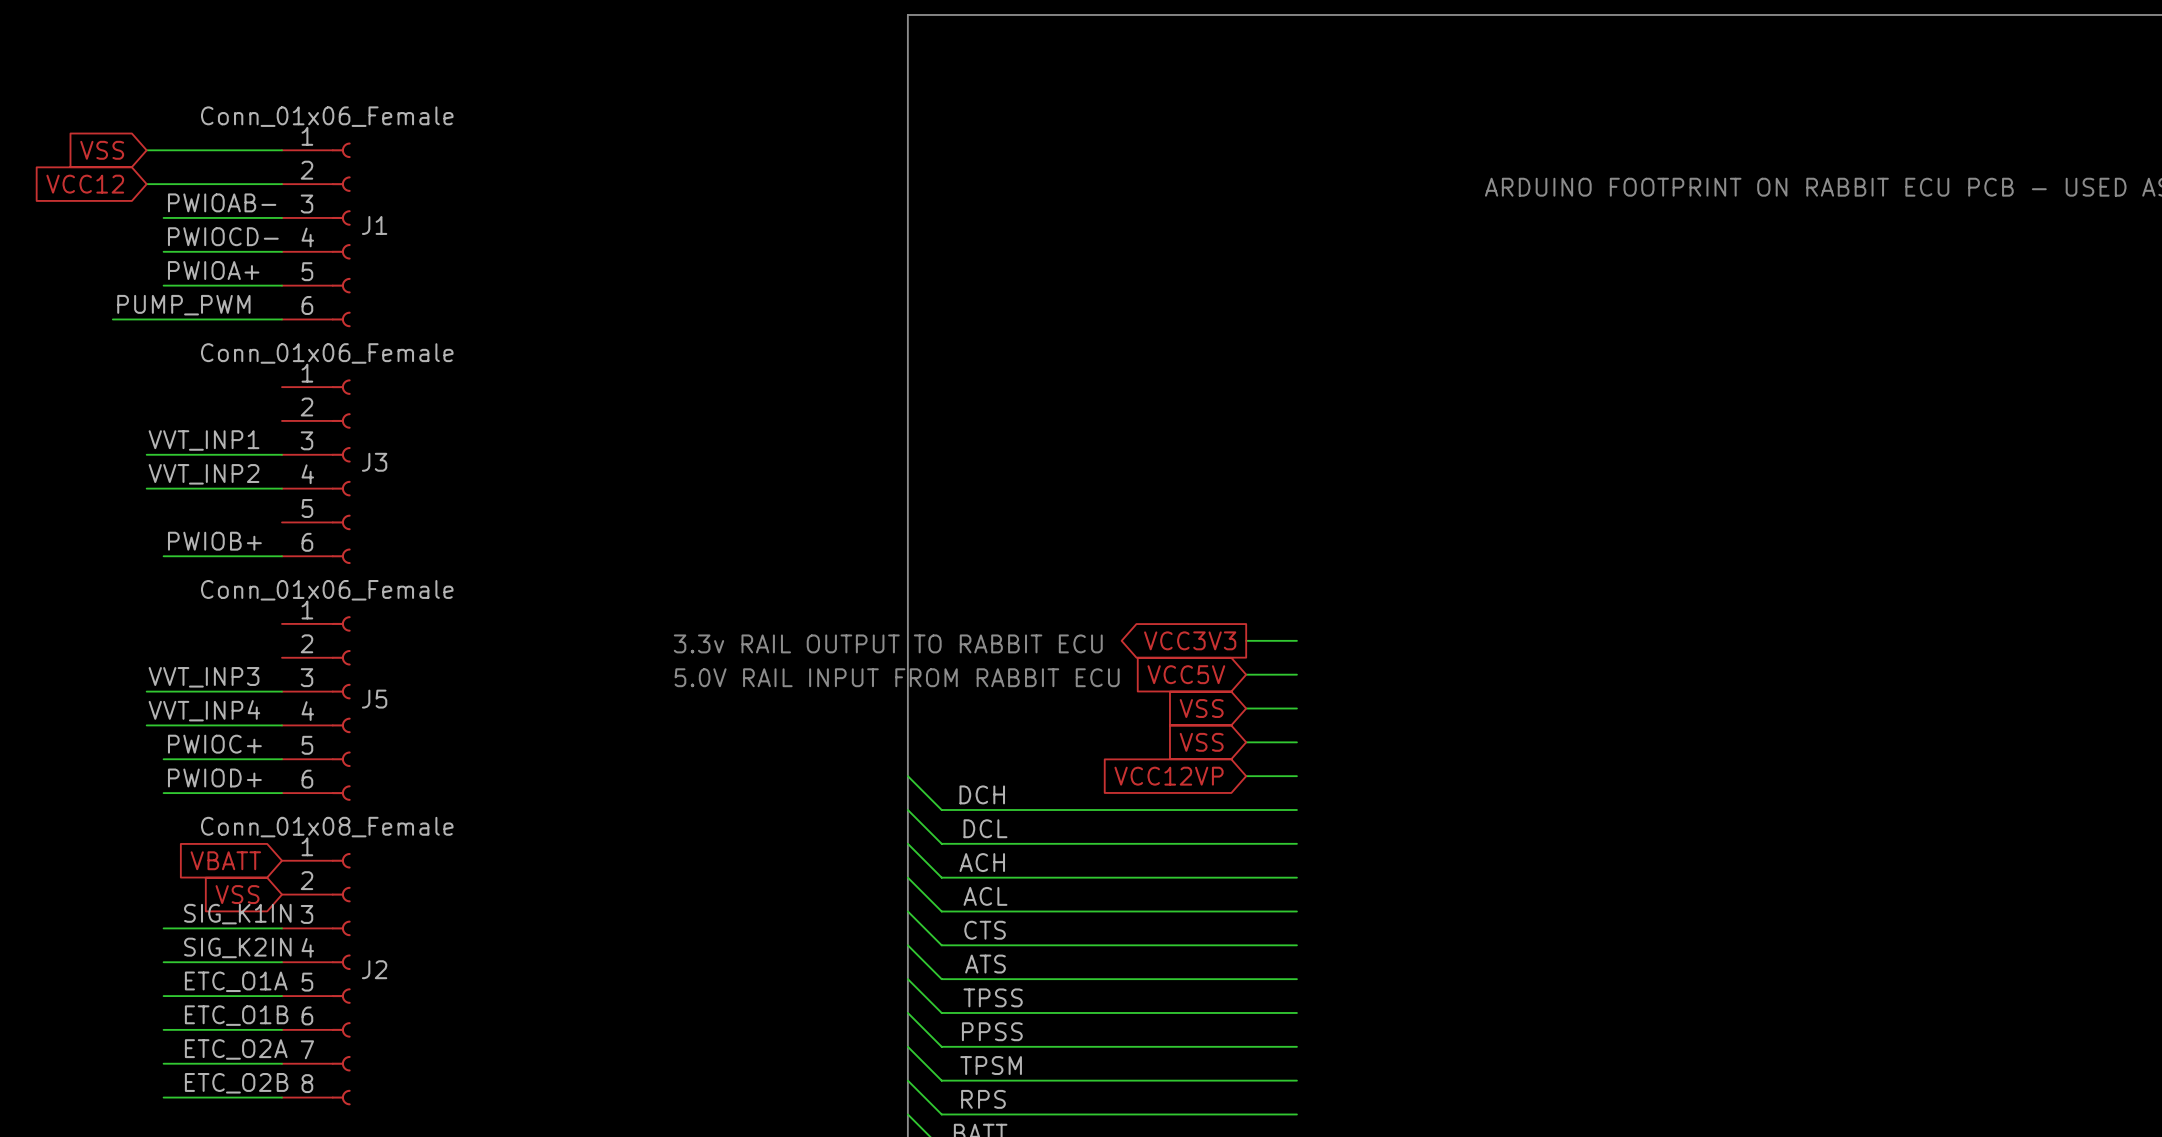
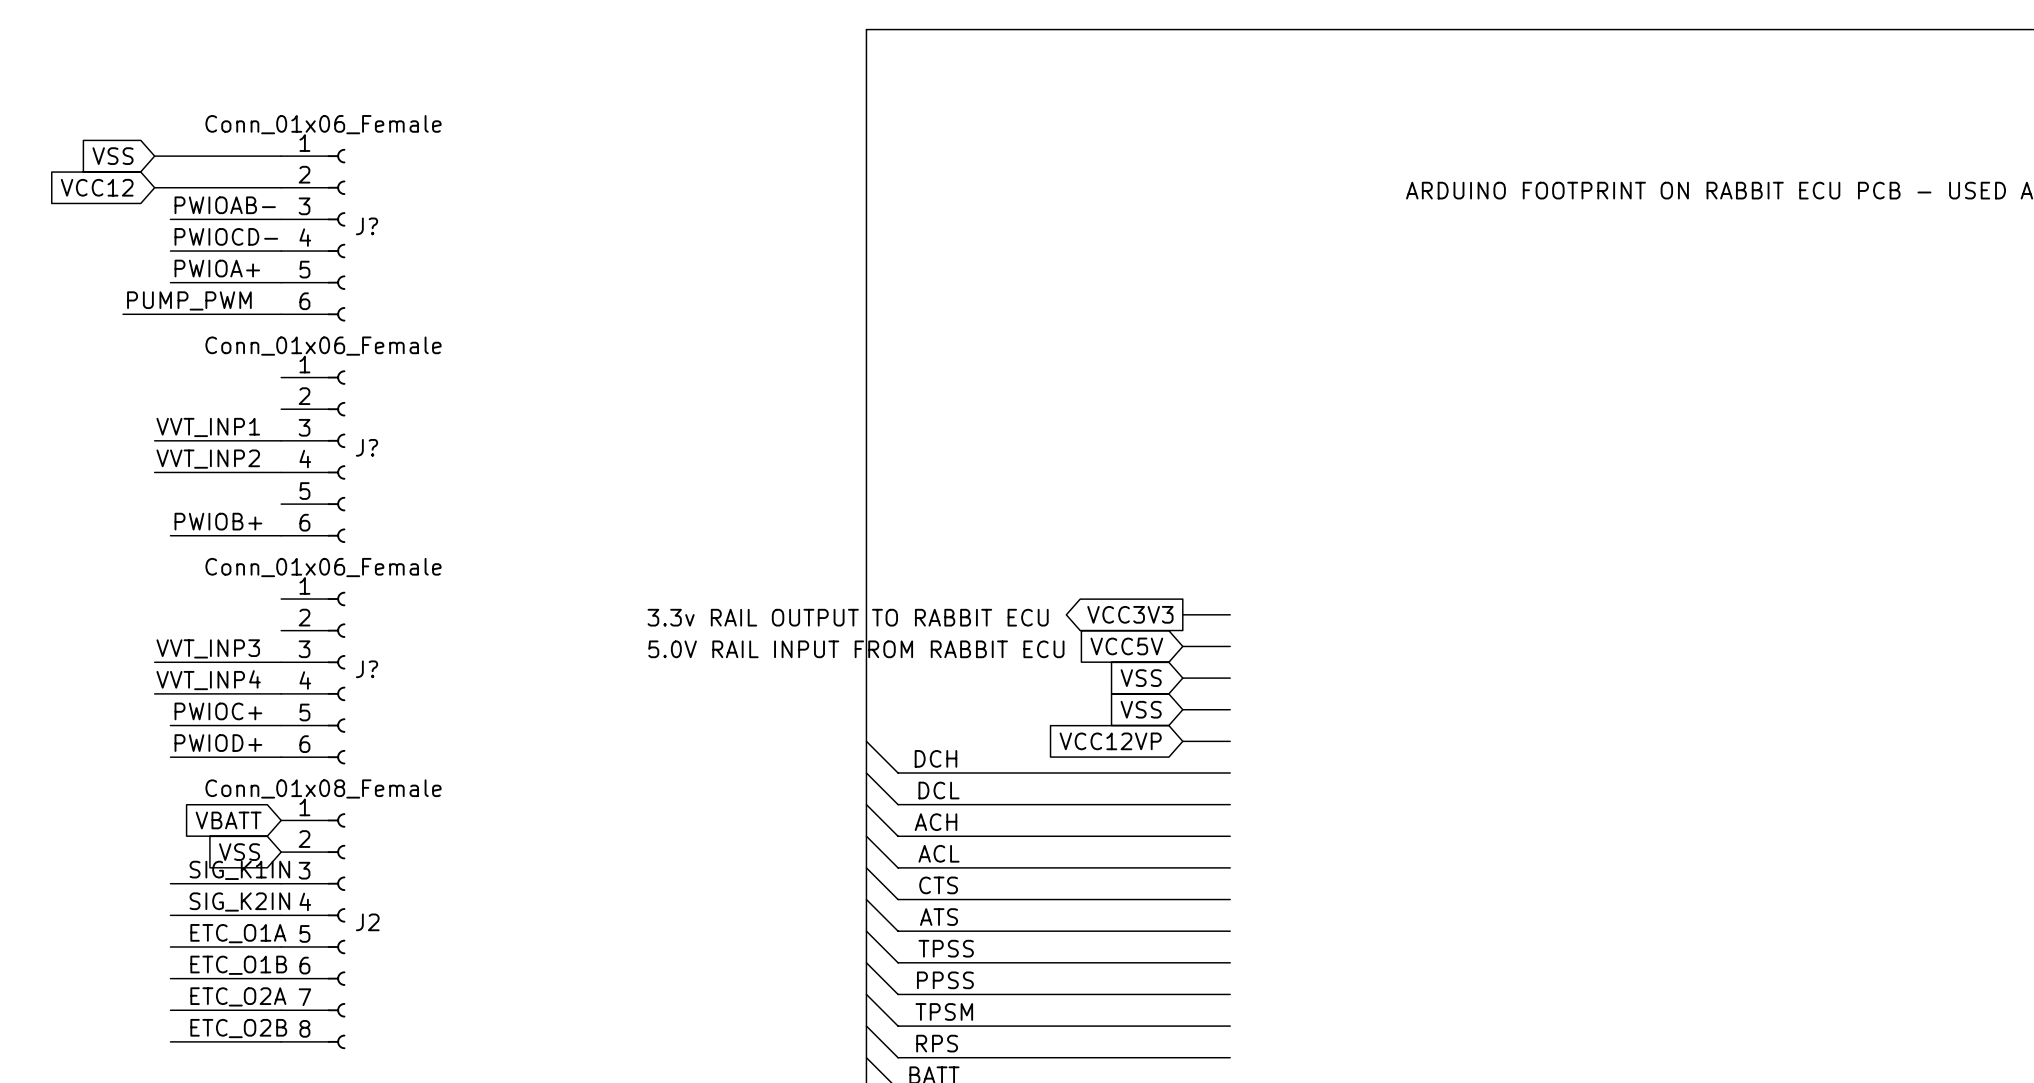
J1 name: J1 (374, 225) -> J? (367, 226)
J3 name: J3 (374, 462) -> J? (367, 447)
J5 name: J5 (374, 699) -> J? (367, 669)

